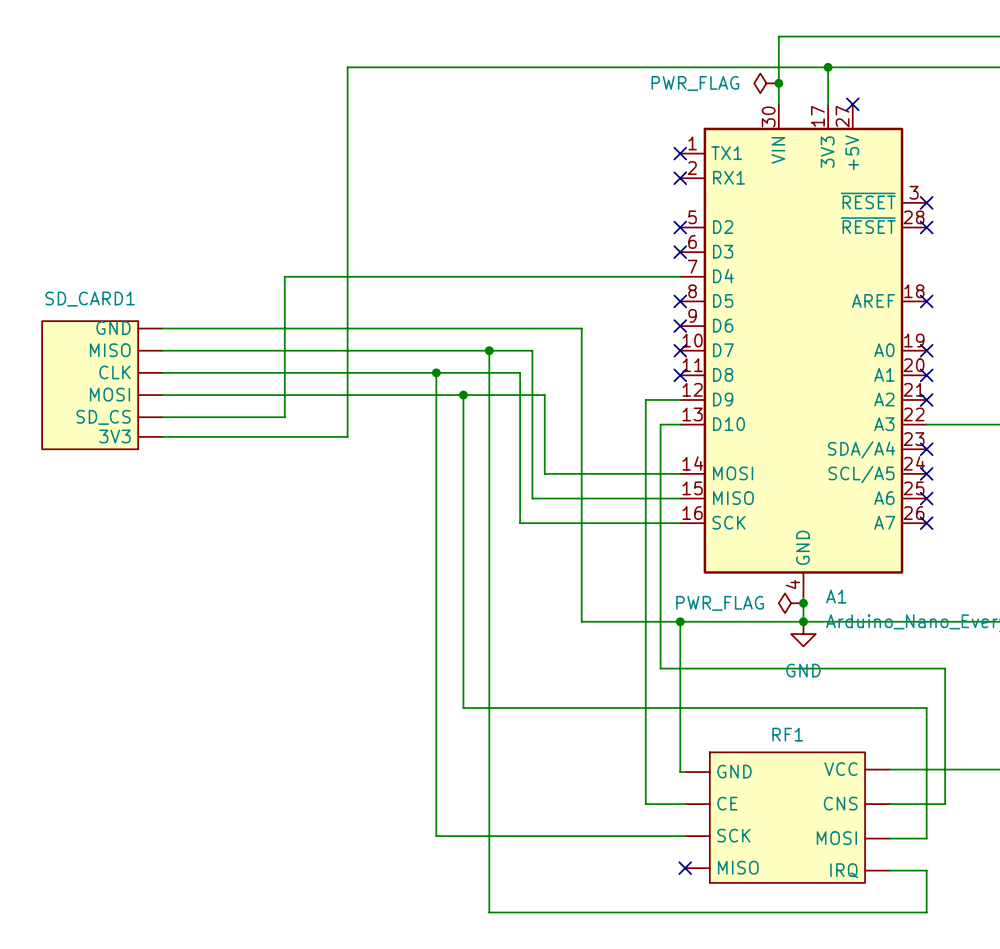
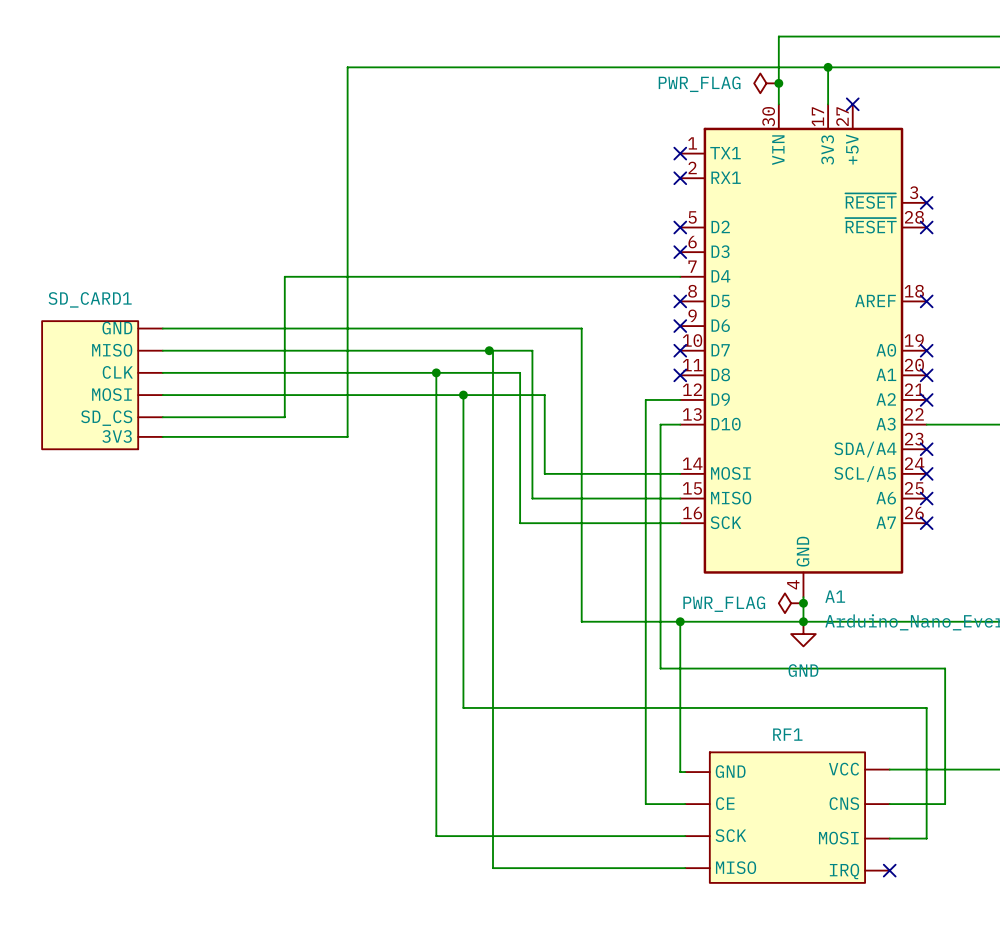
wire: (489, 350) (489, 912) (926, 912) (926, 870) (889, 870) -> none
wire: none -> (493, 350) (493, 868) (685, 868)
no-connect mark: (685, 868) -> none
no-connect mark: none -> (889, 870)

